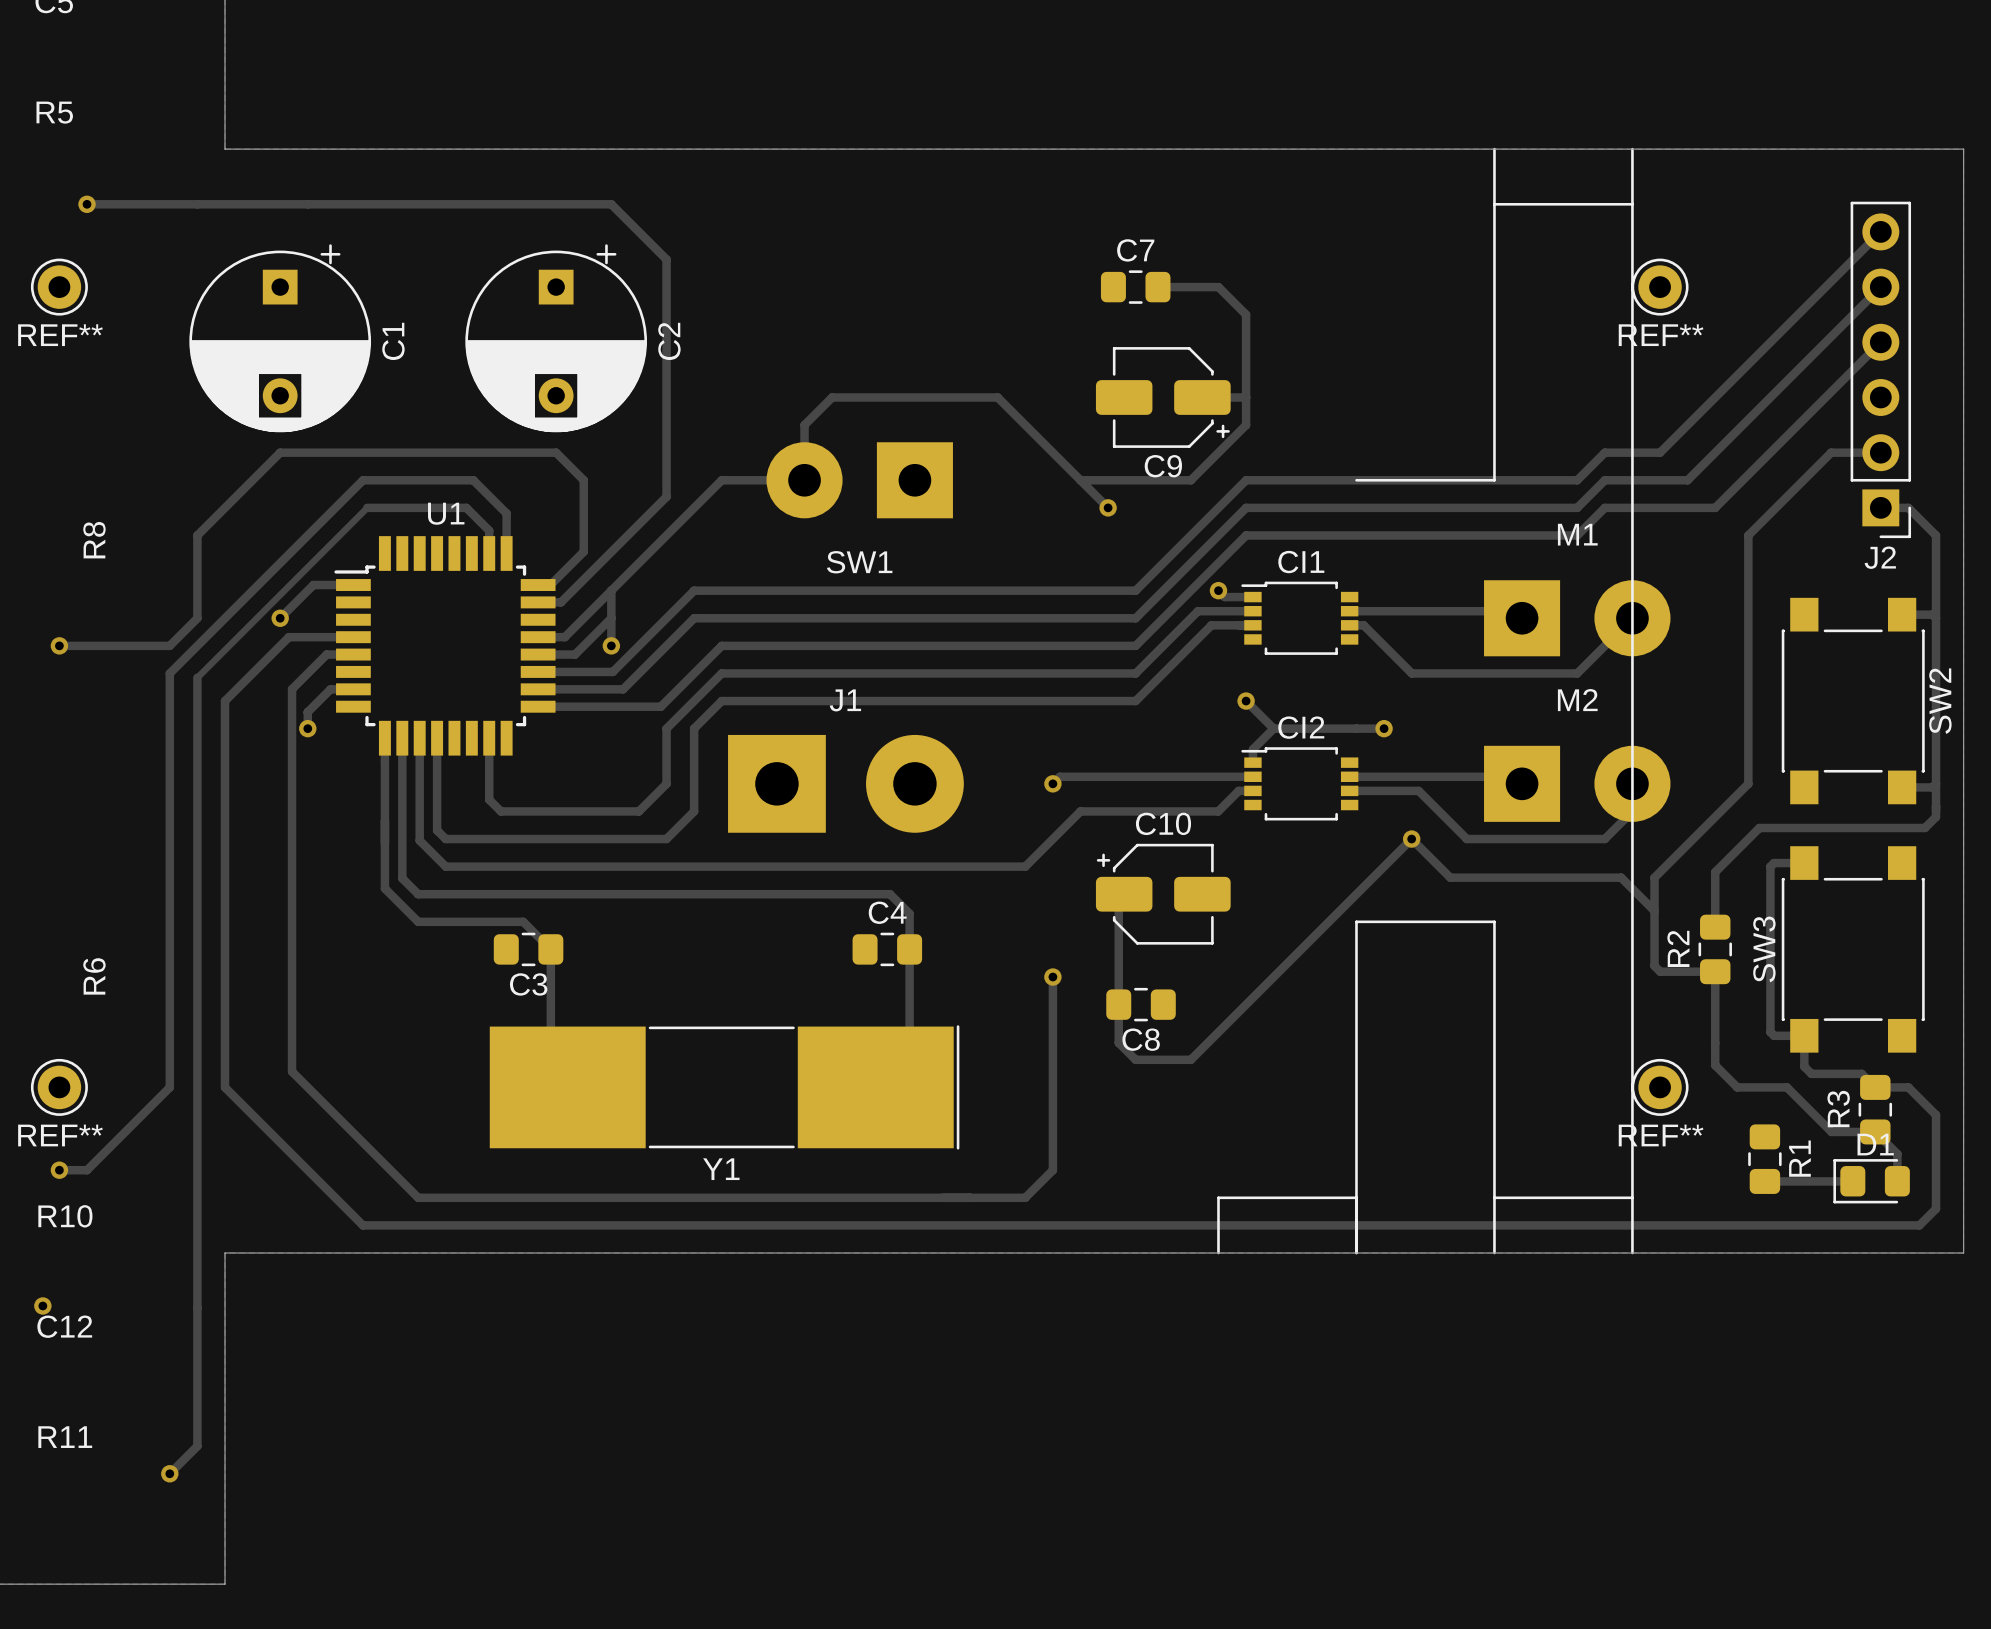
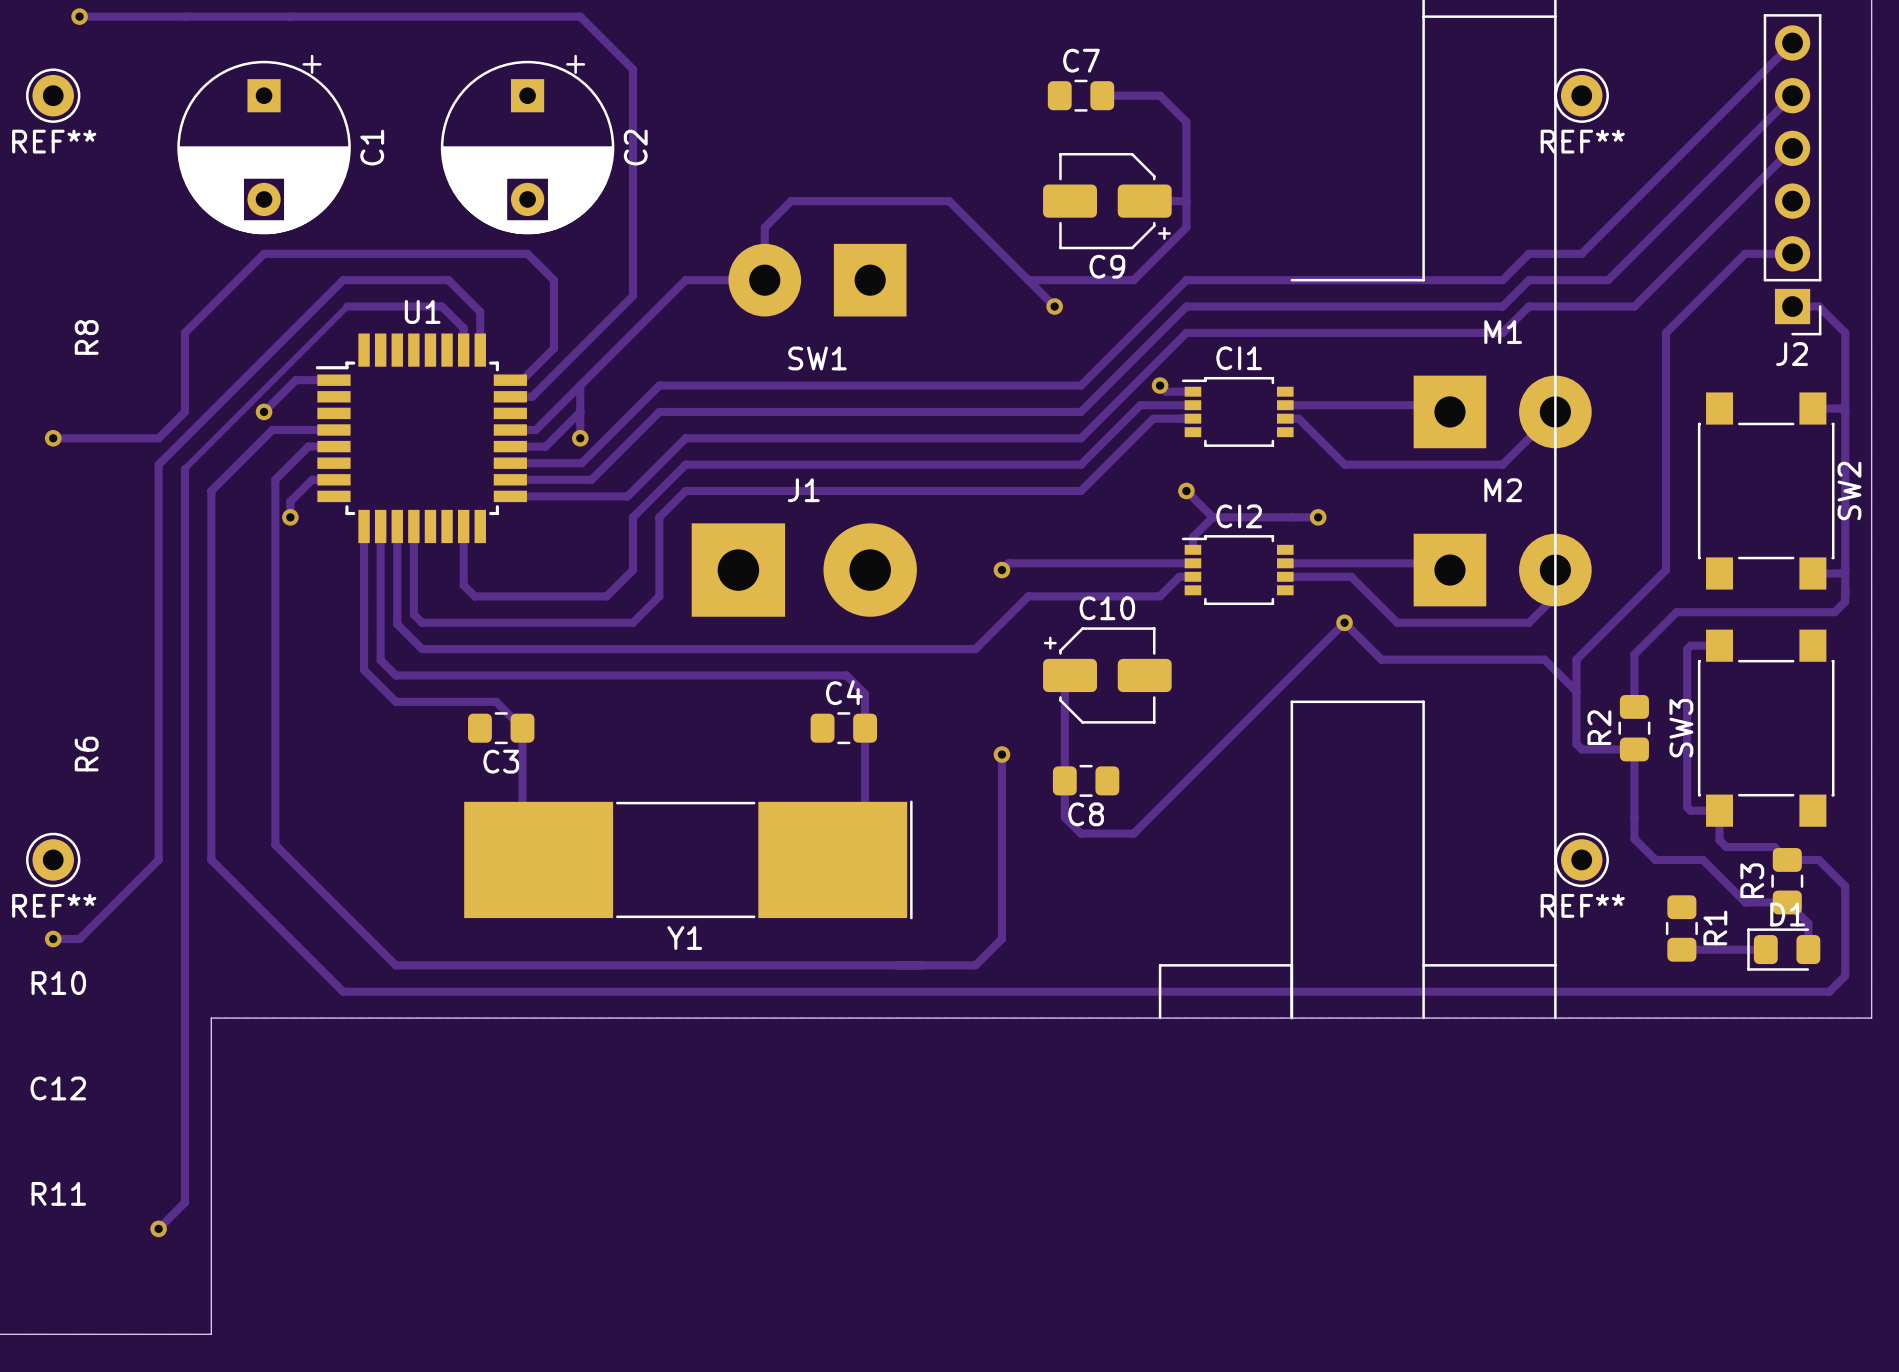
via: (42, 1305) -> none

